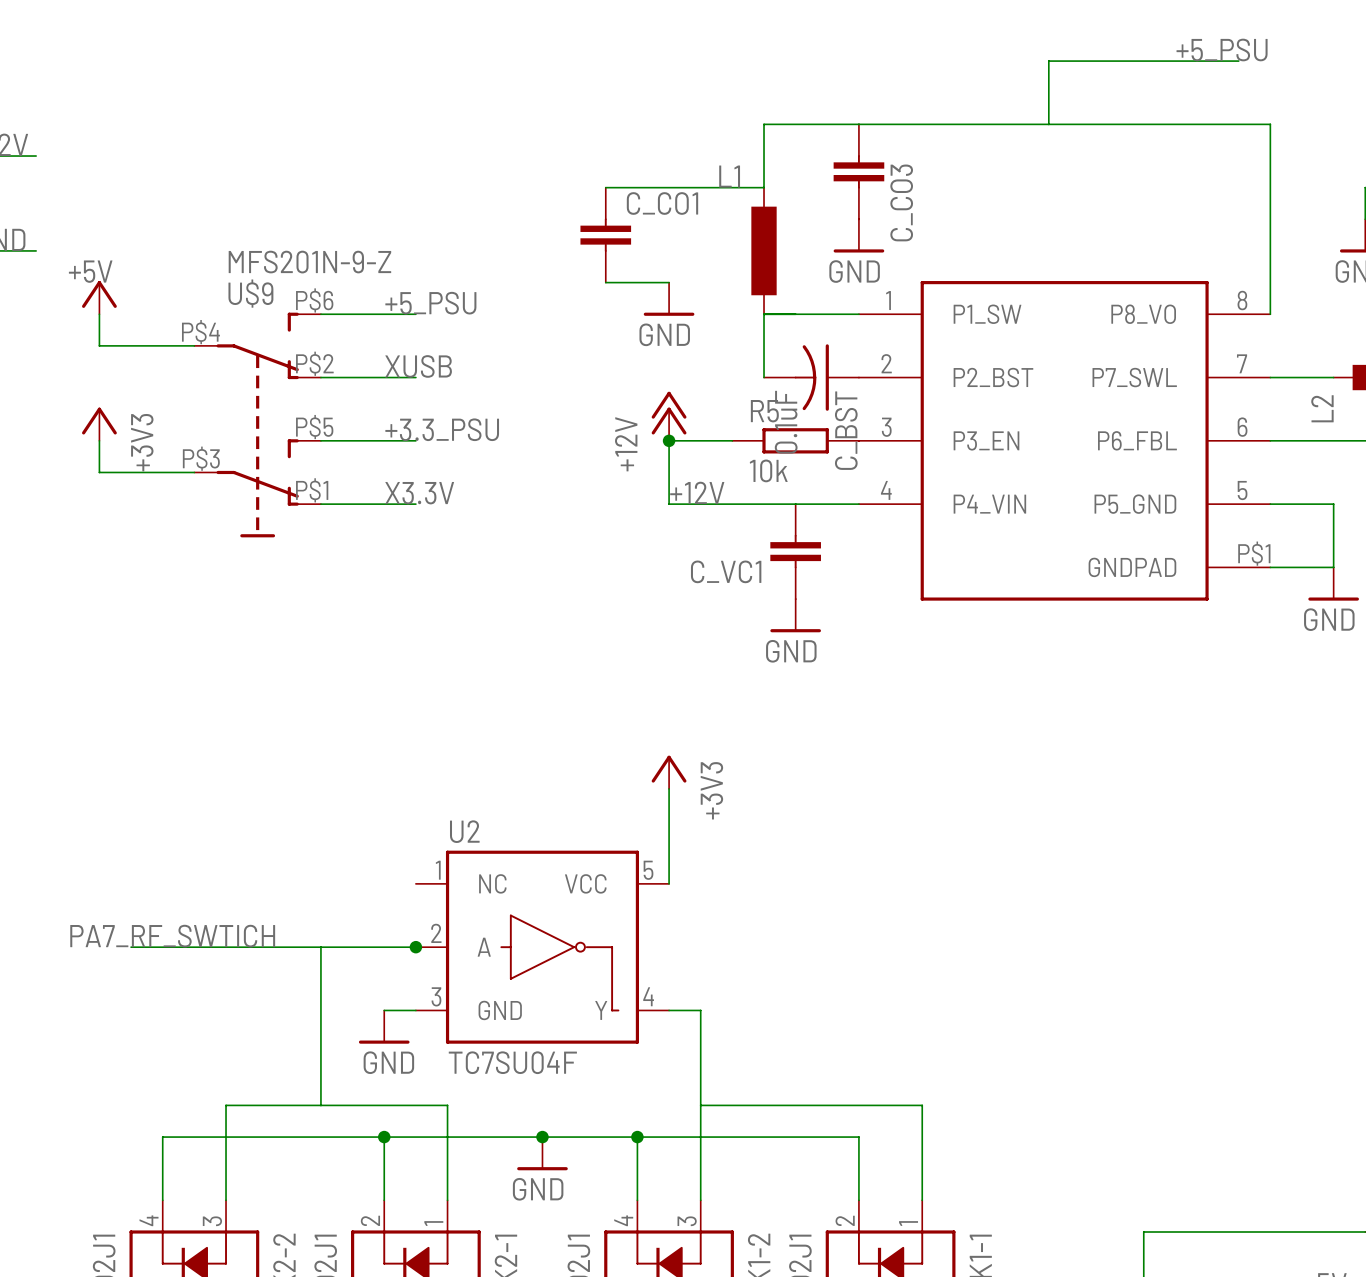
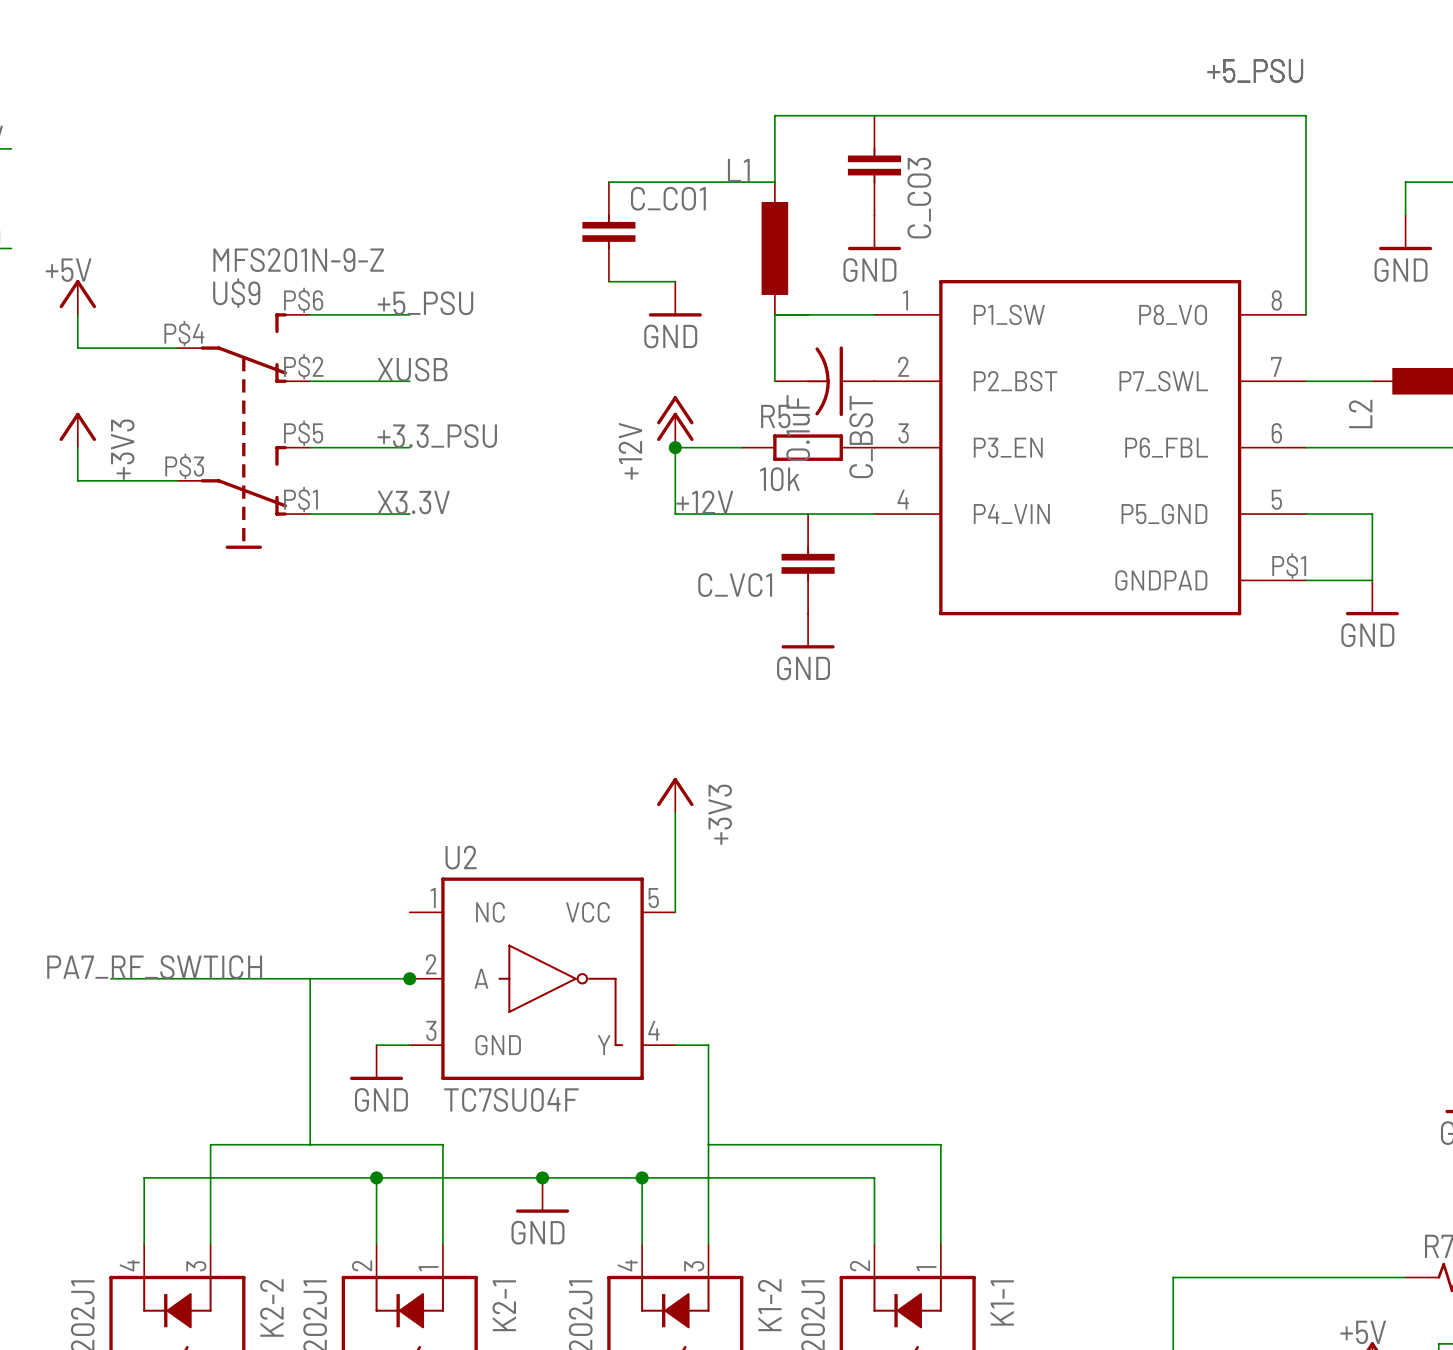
label position: +5_PSU (1222, 50) -> +5_PSU (1255, 70)
wire: (1238, 61) (1048, 61) (1048, 124) -> none

